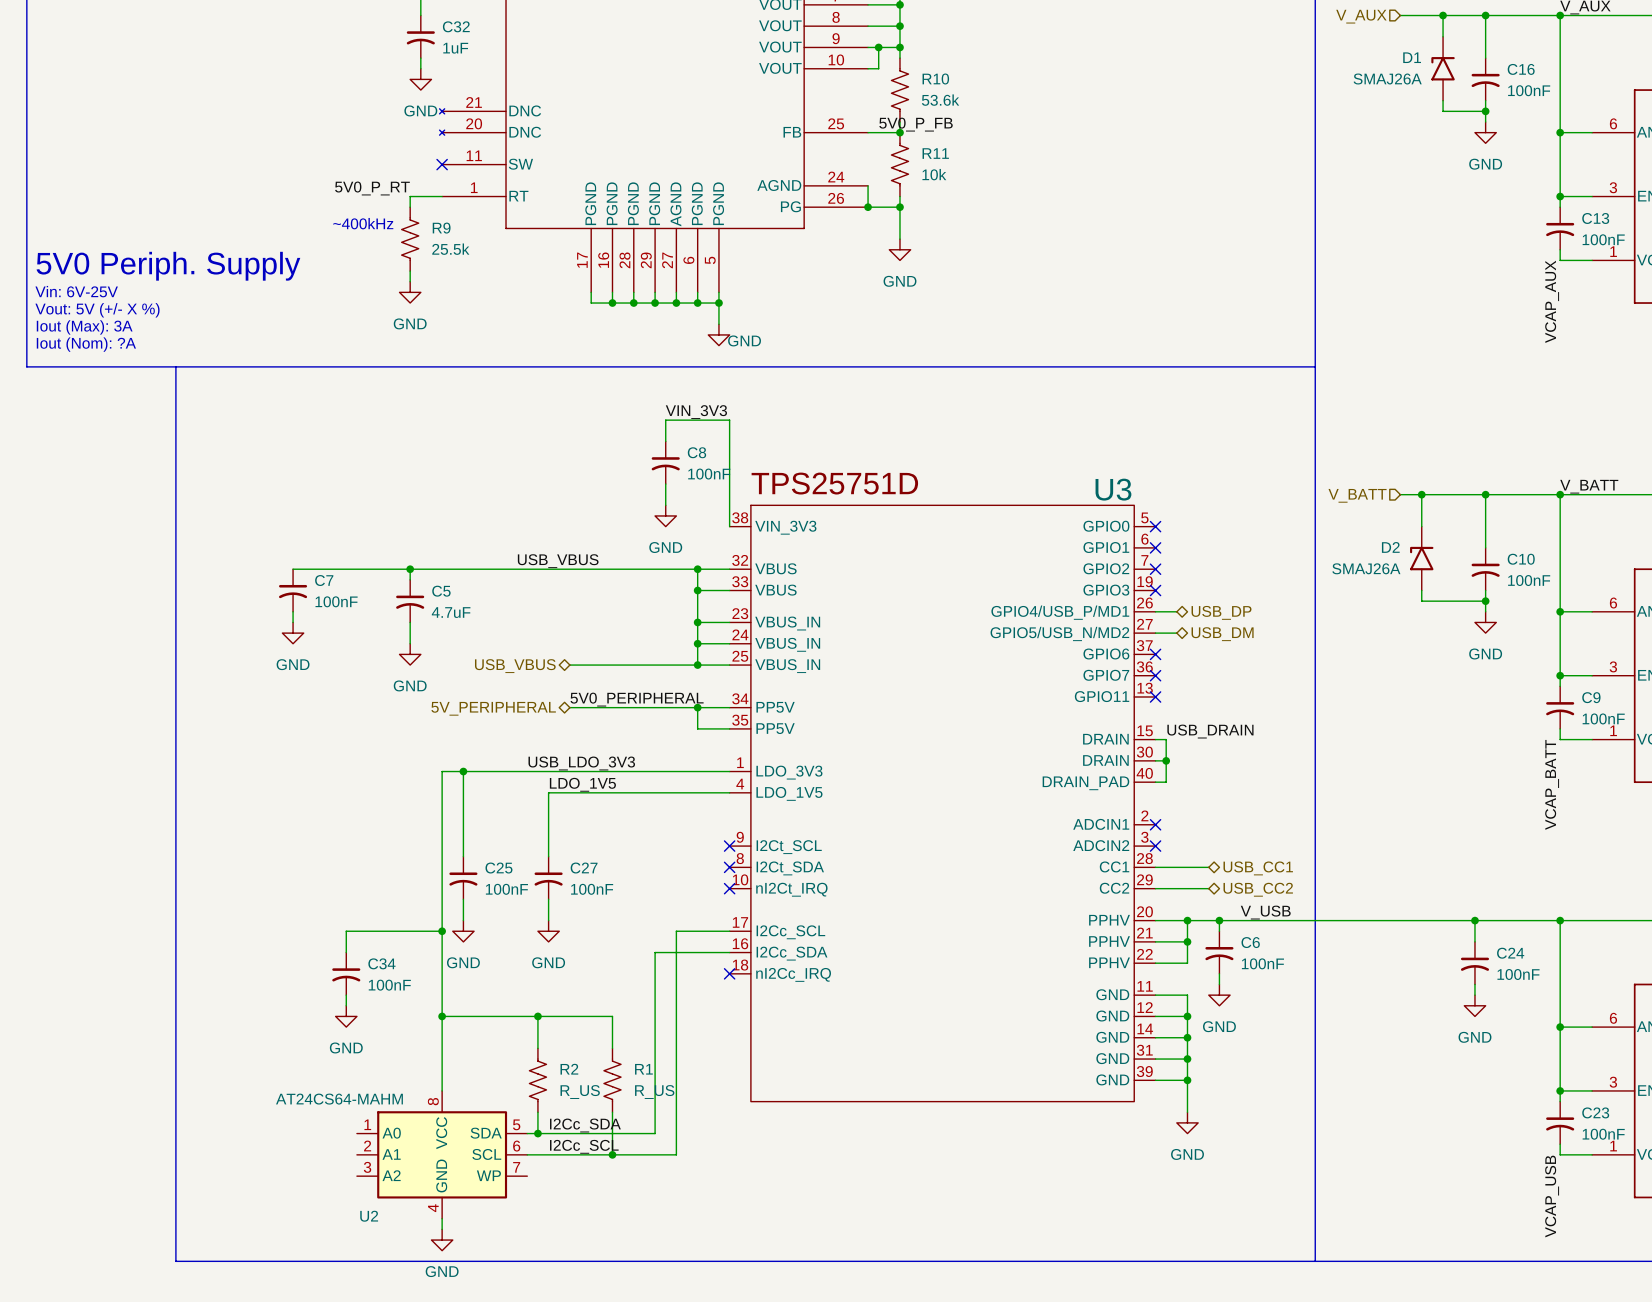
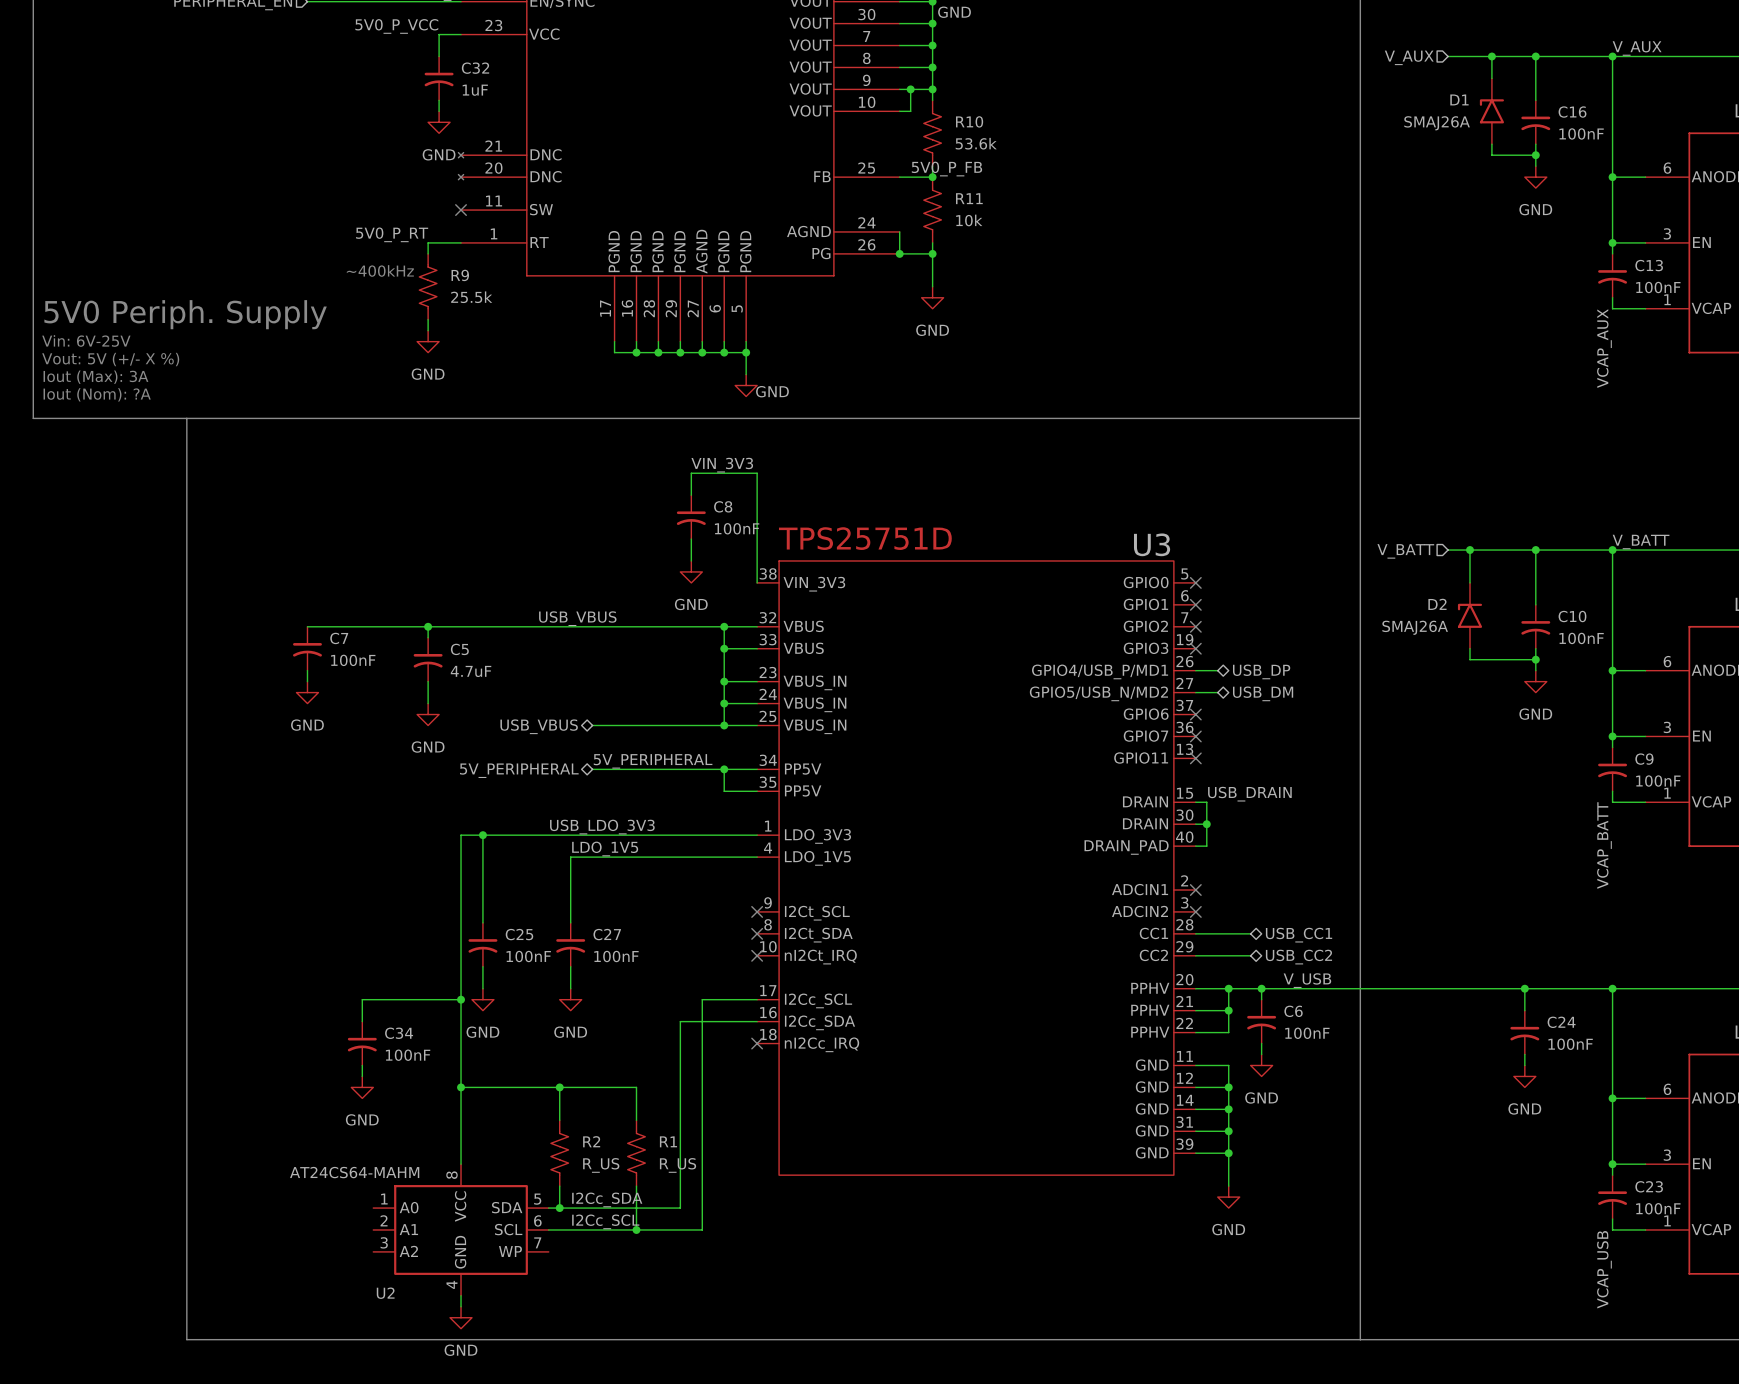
label: 5V0_PERIPHERAL (637, 699) -> 5V_PERIPHERAL (653, 761)

